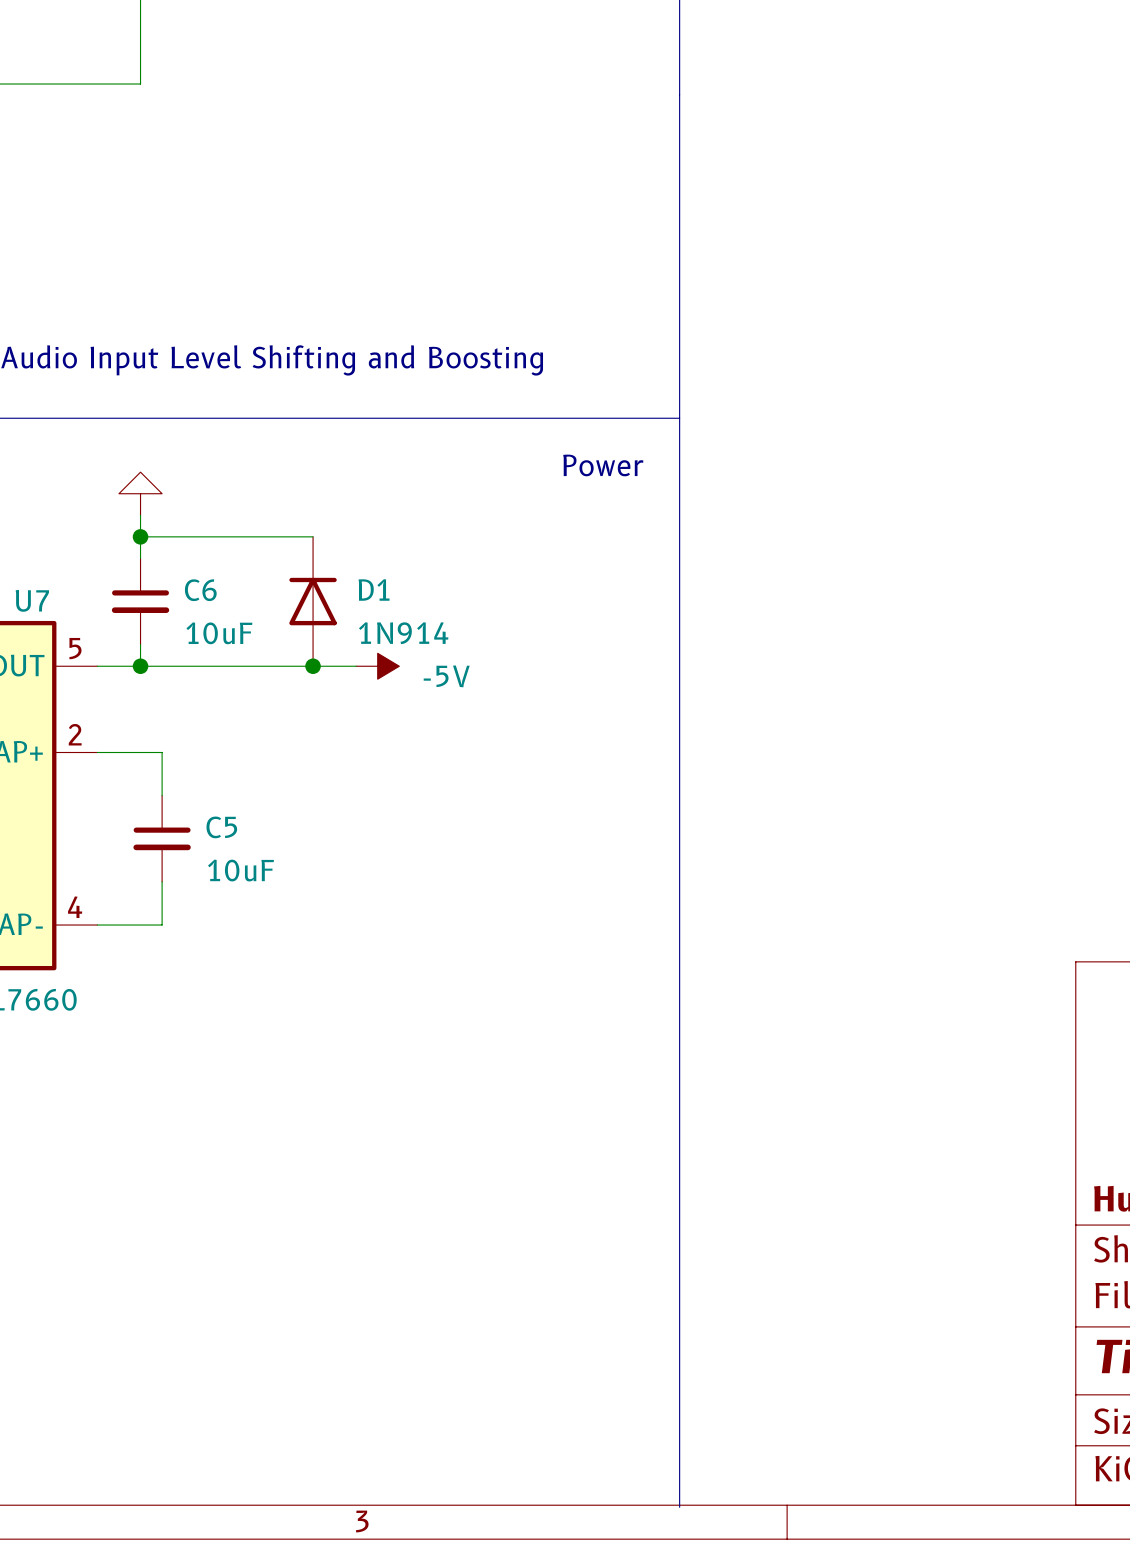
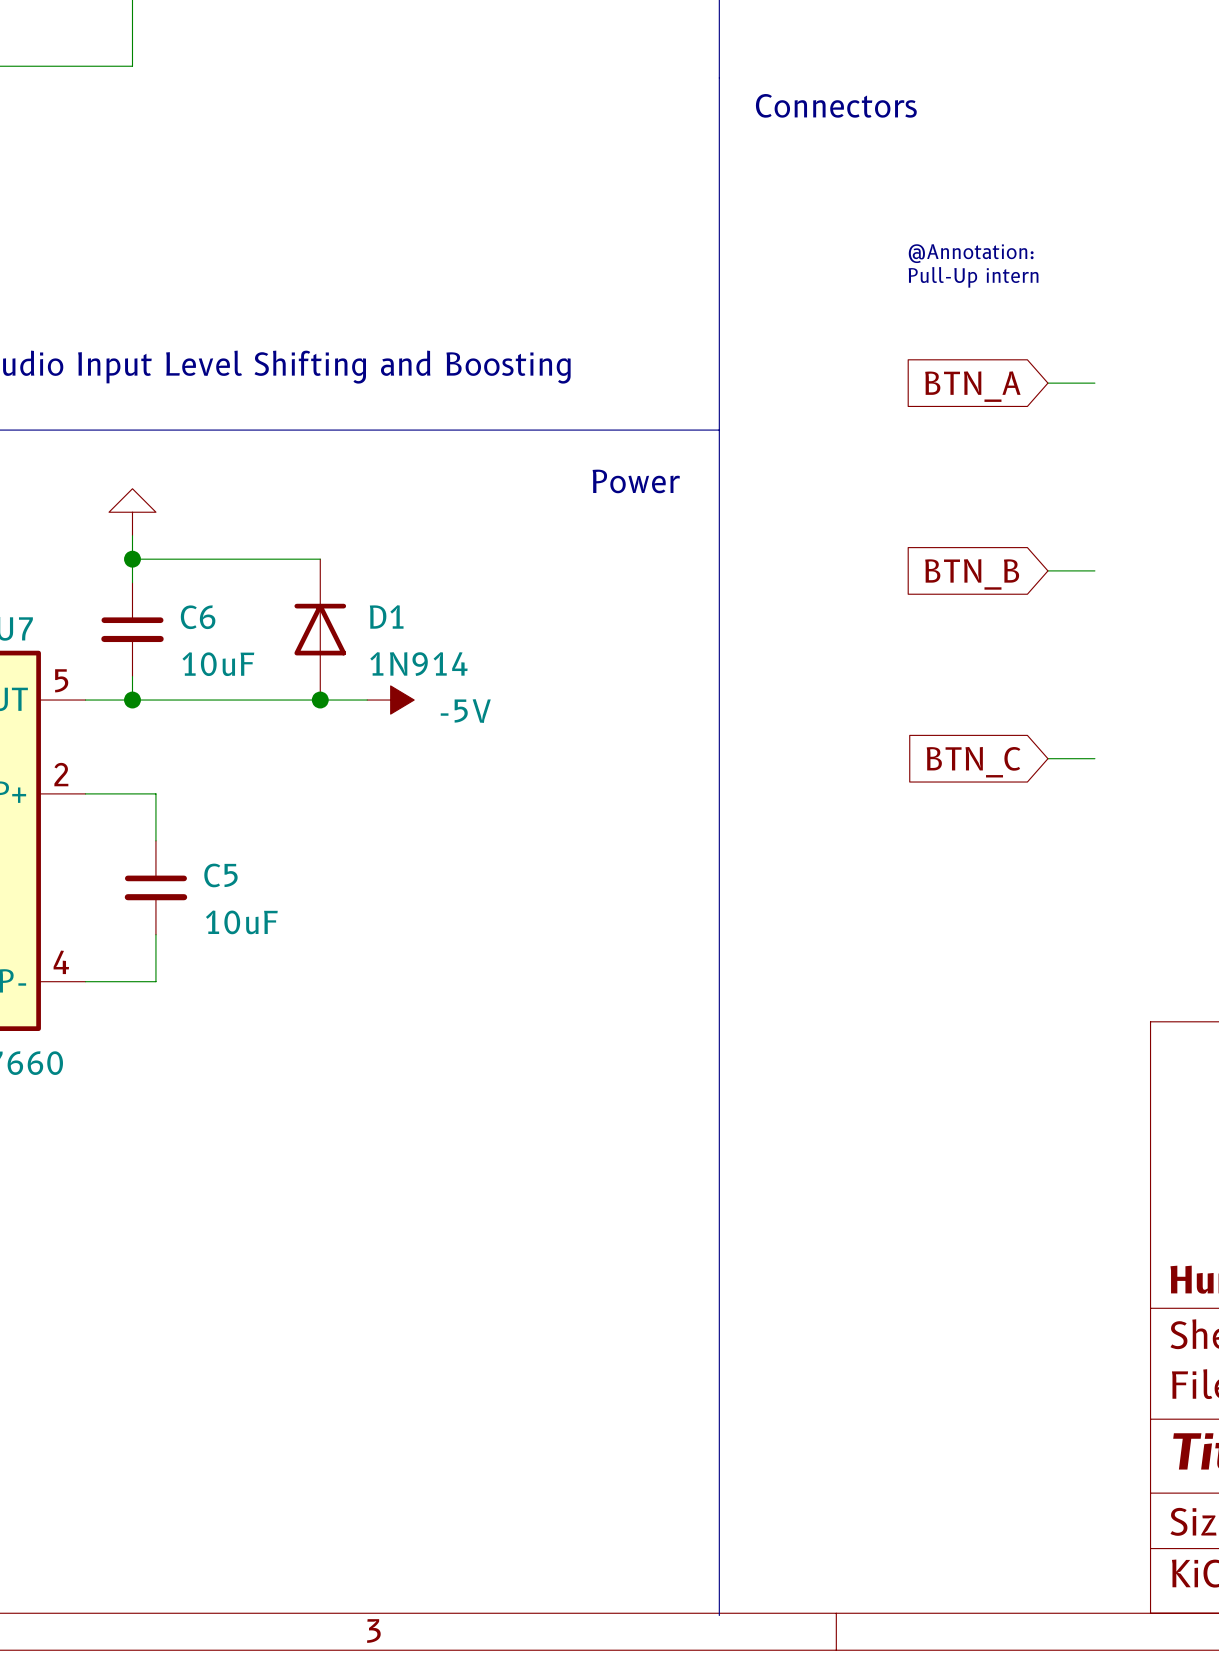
text: none -> Connectors (836, 105)
text: none -> @Annotation: (971, 253)
text: none -> Pull-Up intern (973, 277)
wire: none -> (1047, 383) (1094, 383)
global label: none -> BTN_A (972, 386)
wire: none -> (1047, 570) (1094, 570)
global label: none -> BTN_B (972, 574)
wire: none -> (1047, 758) (1094, 758)
global label: none -> BTN_C (973, 762)

